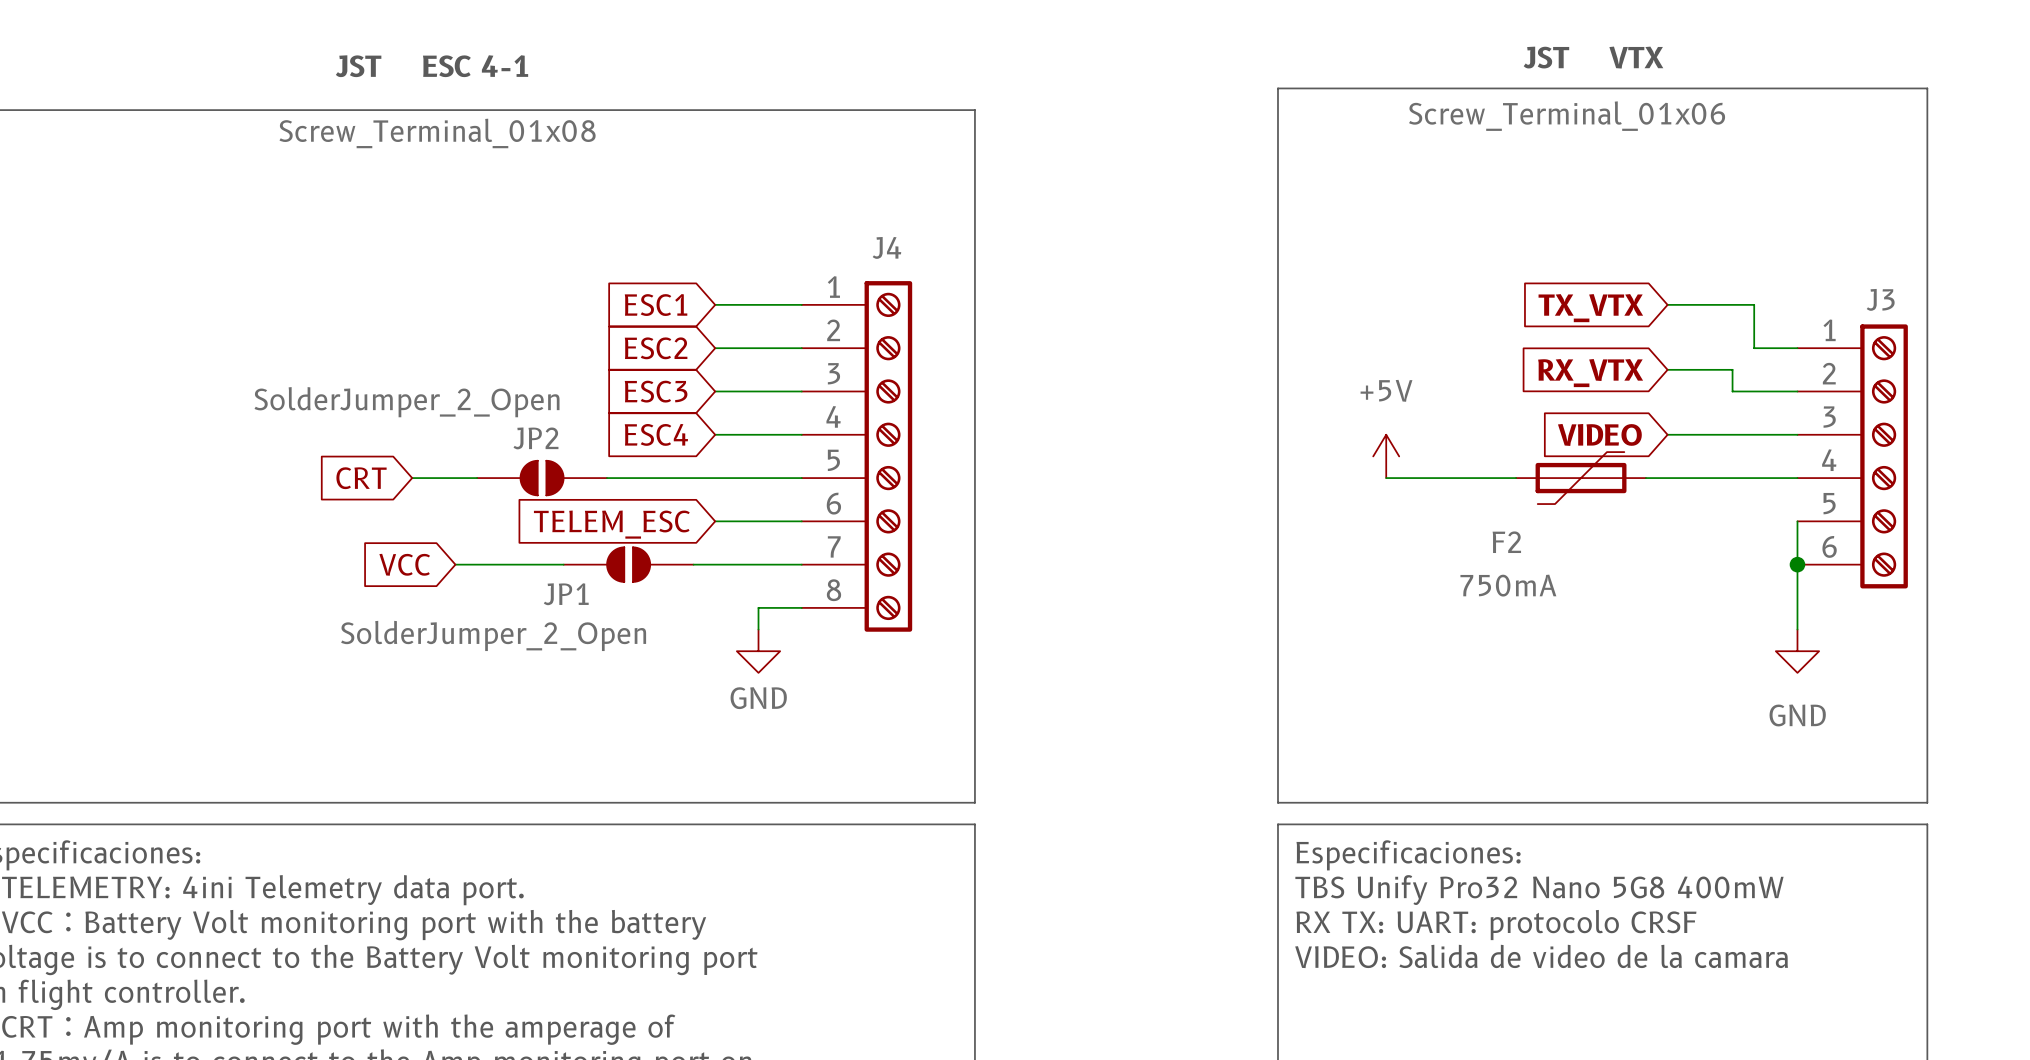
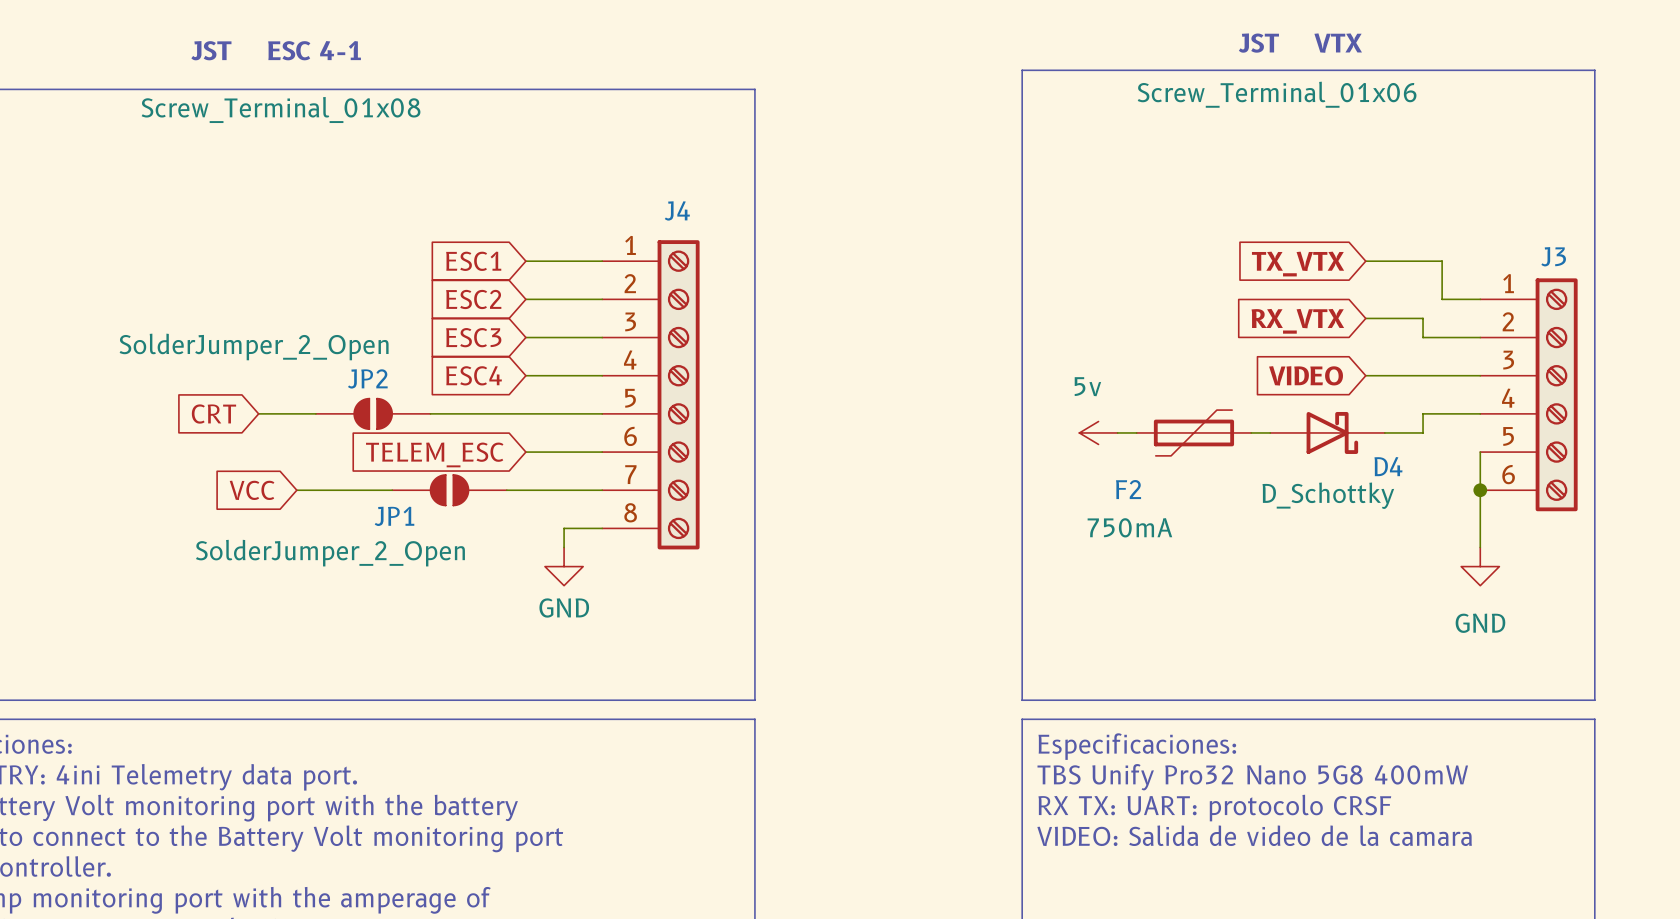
power symbol: +5V (1386, 456) -> none
wire: (1386, 478) (1516, 478) -> none
F2 position: (1581, 478) -> (1193, 432)
wire: (1645, 478) (1732, 478) -> (1384, 432) (1423, 432) (1423, 413)
power symbol: none -> 5v (1098, 432)
wire: none -> (1117, 432) (1136, 432)
wire: none -> (1251, 432) (1270, 432)
D4: none -> D_Schottky (1327, 432)

